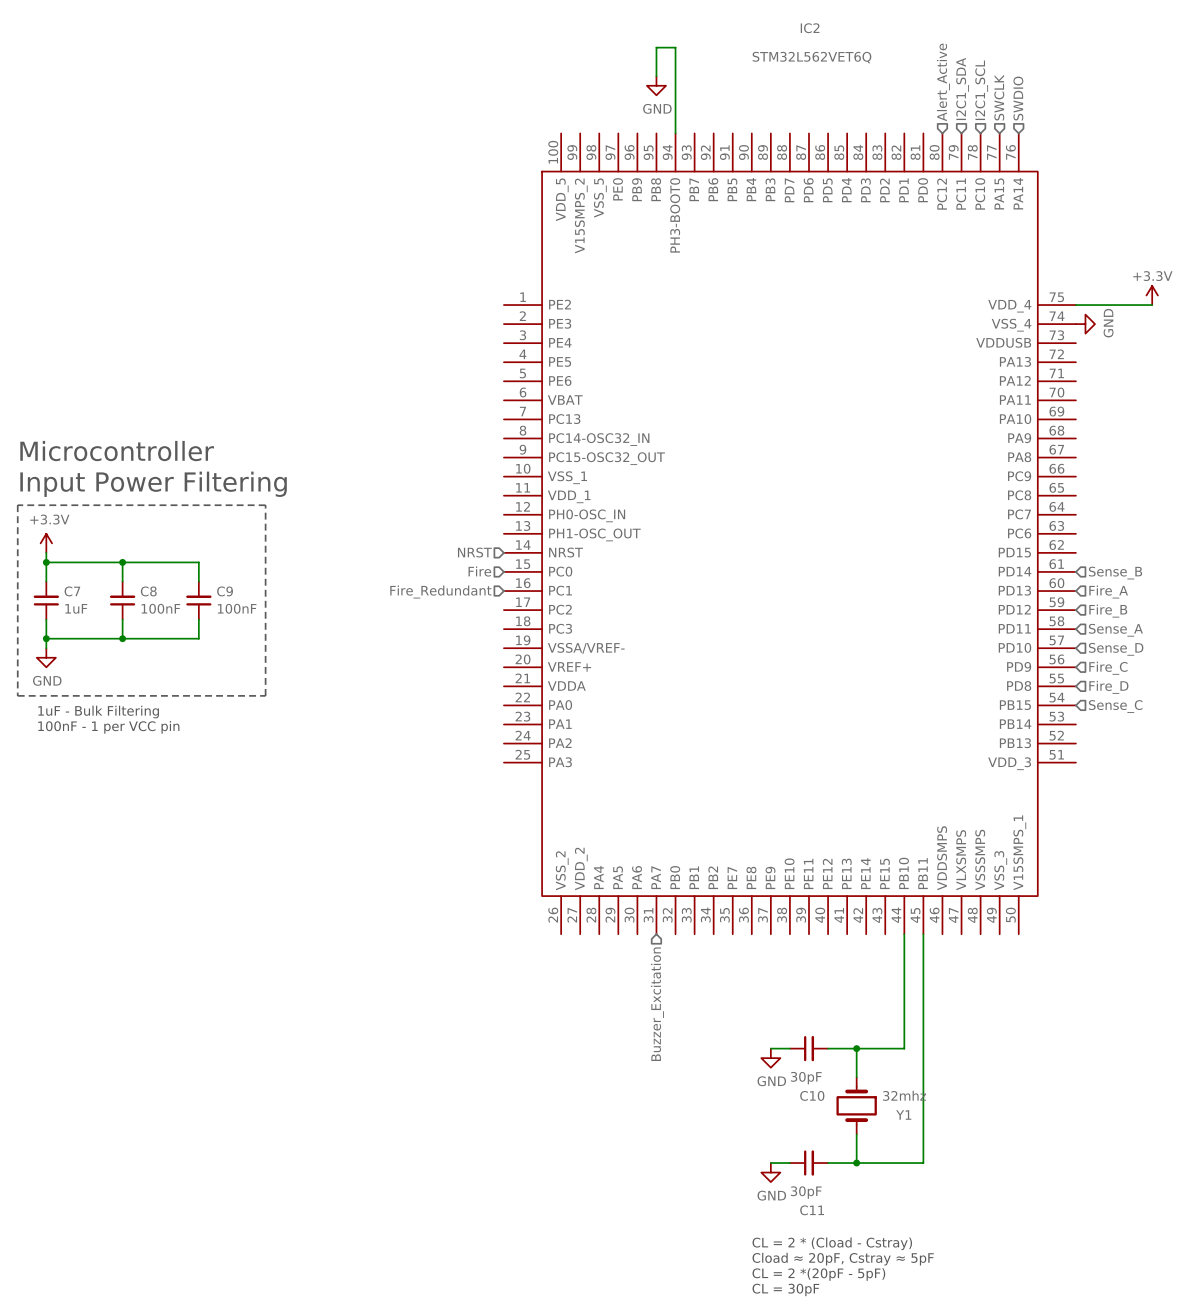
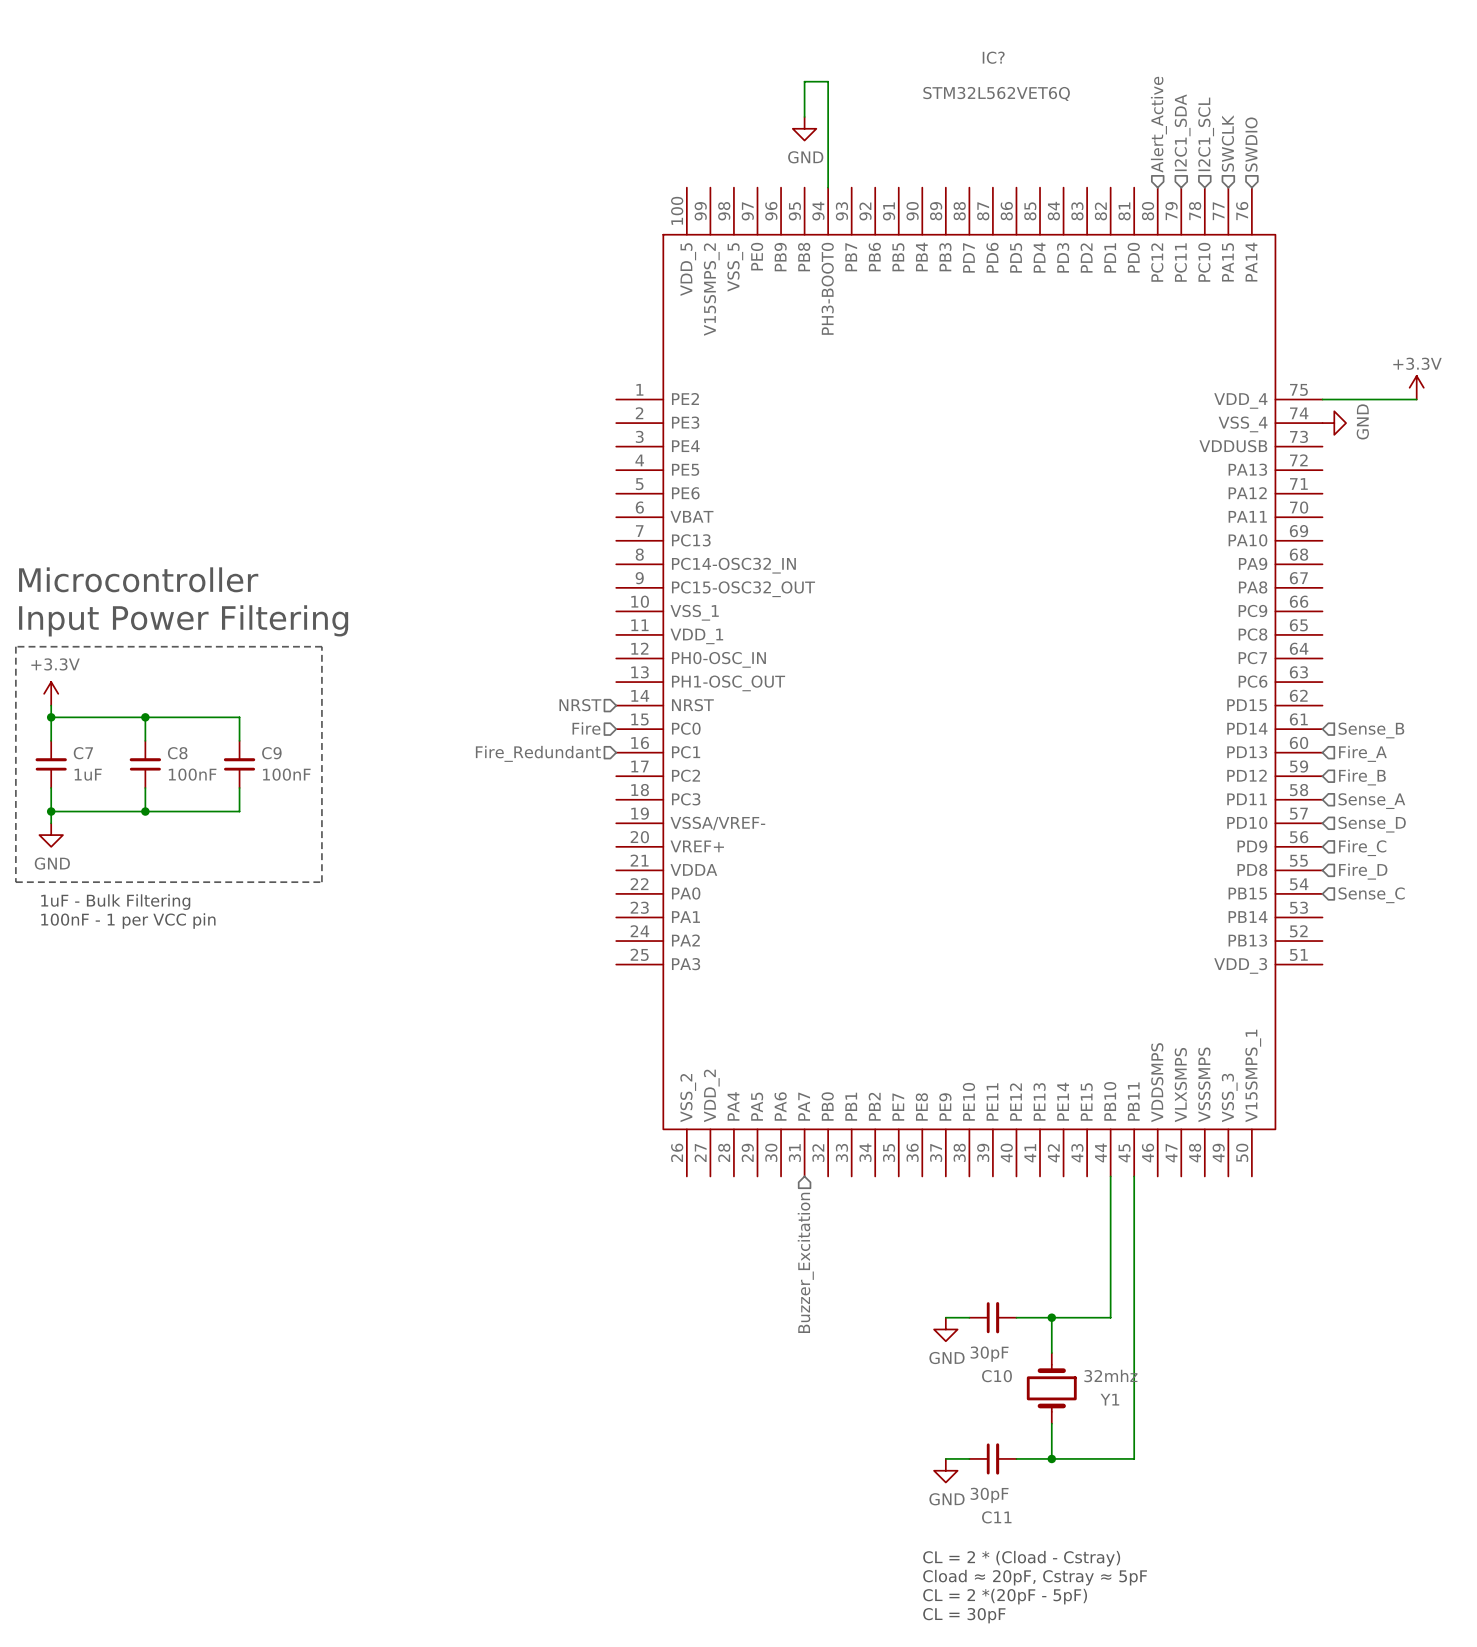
IC2 name: IC2 (810, 28) -> IC? (993, 57)

